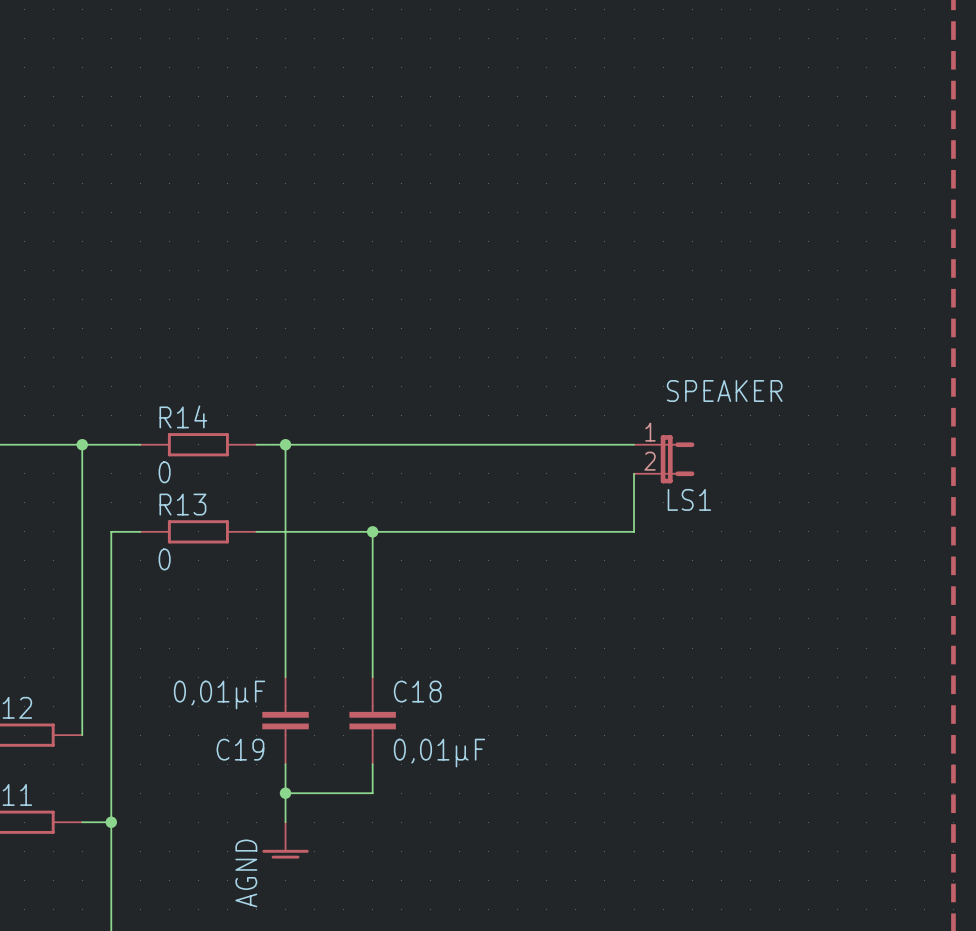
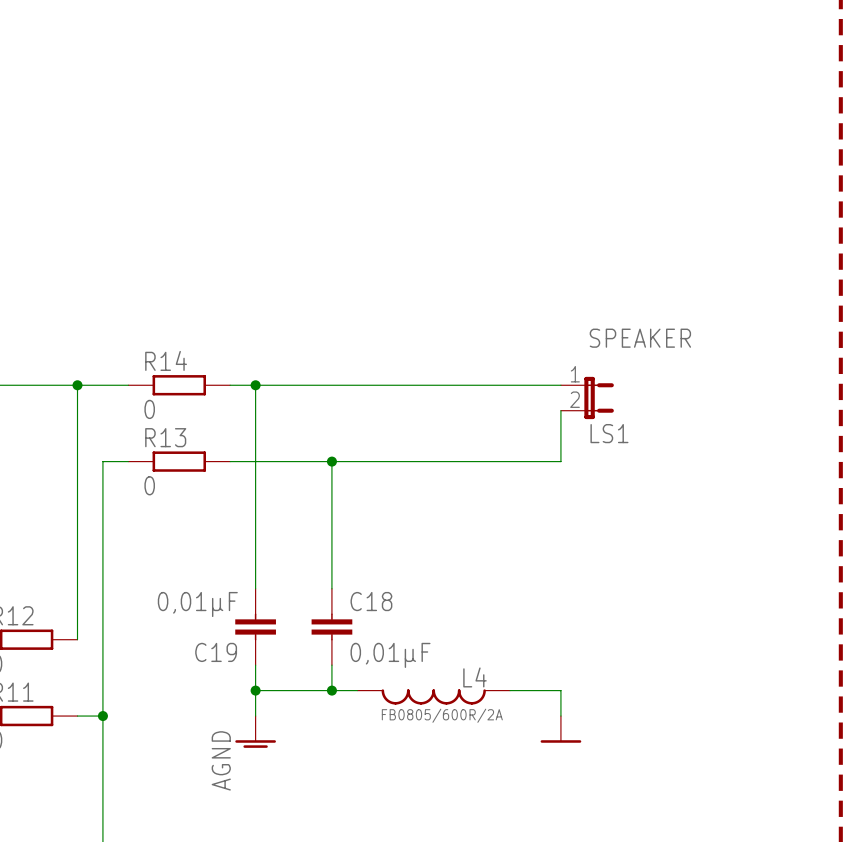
wire: none -> (331, 690) (357, 690)
junction: none -> (331, 690)
wire: none -> (510, 690) (560, 690) (560, 716)
L4: none -> FB0805/600R/2A (433, 696)
power symbol: none -> (560, 729)

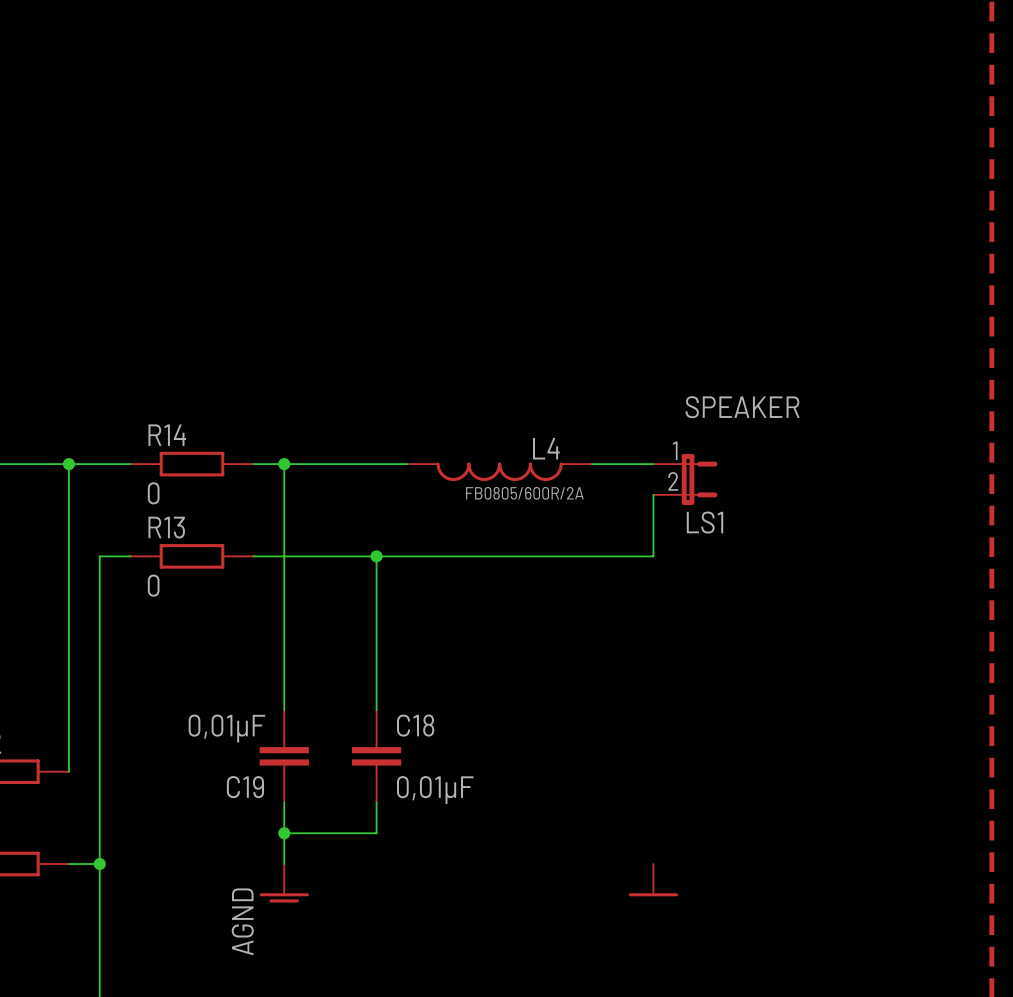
wire: (357, 385) (510, 385) -> none
wire: (331, 690) (357, 690) -> none
junction: (331, 690) -> none
wire: (510, 690) (560, 690) (560, 716) -> none
L4 position: (433, 696) -> (499, 471)

